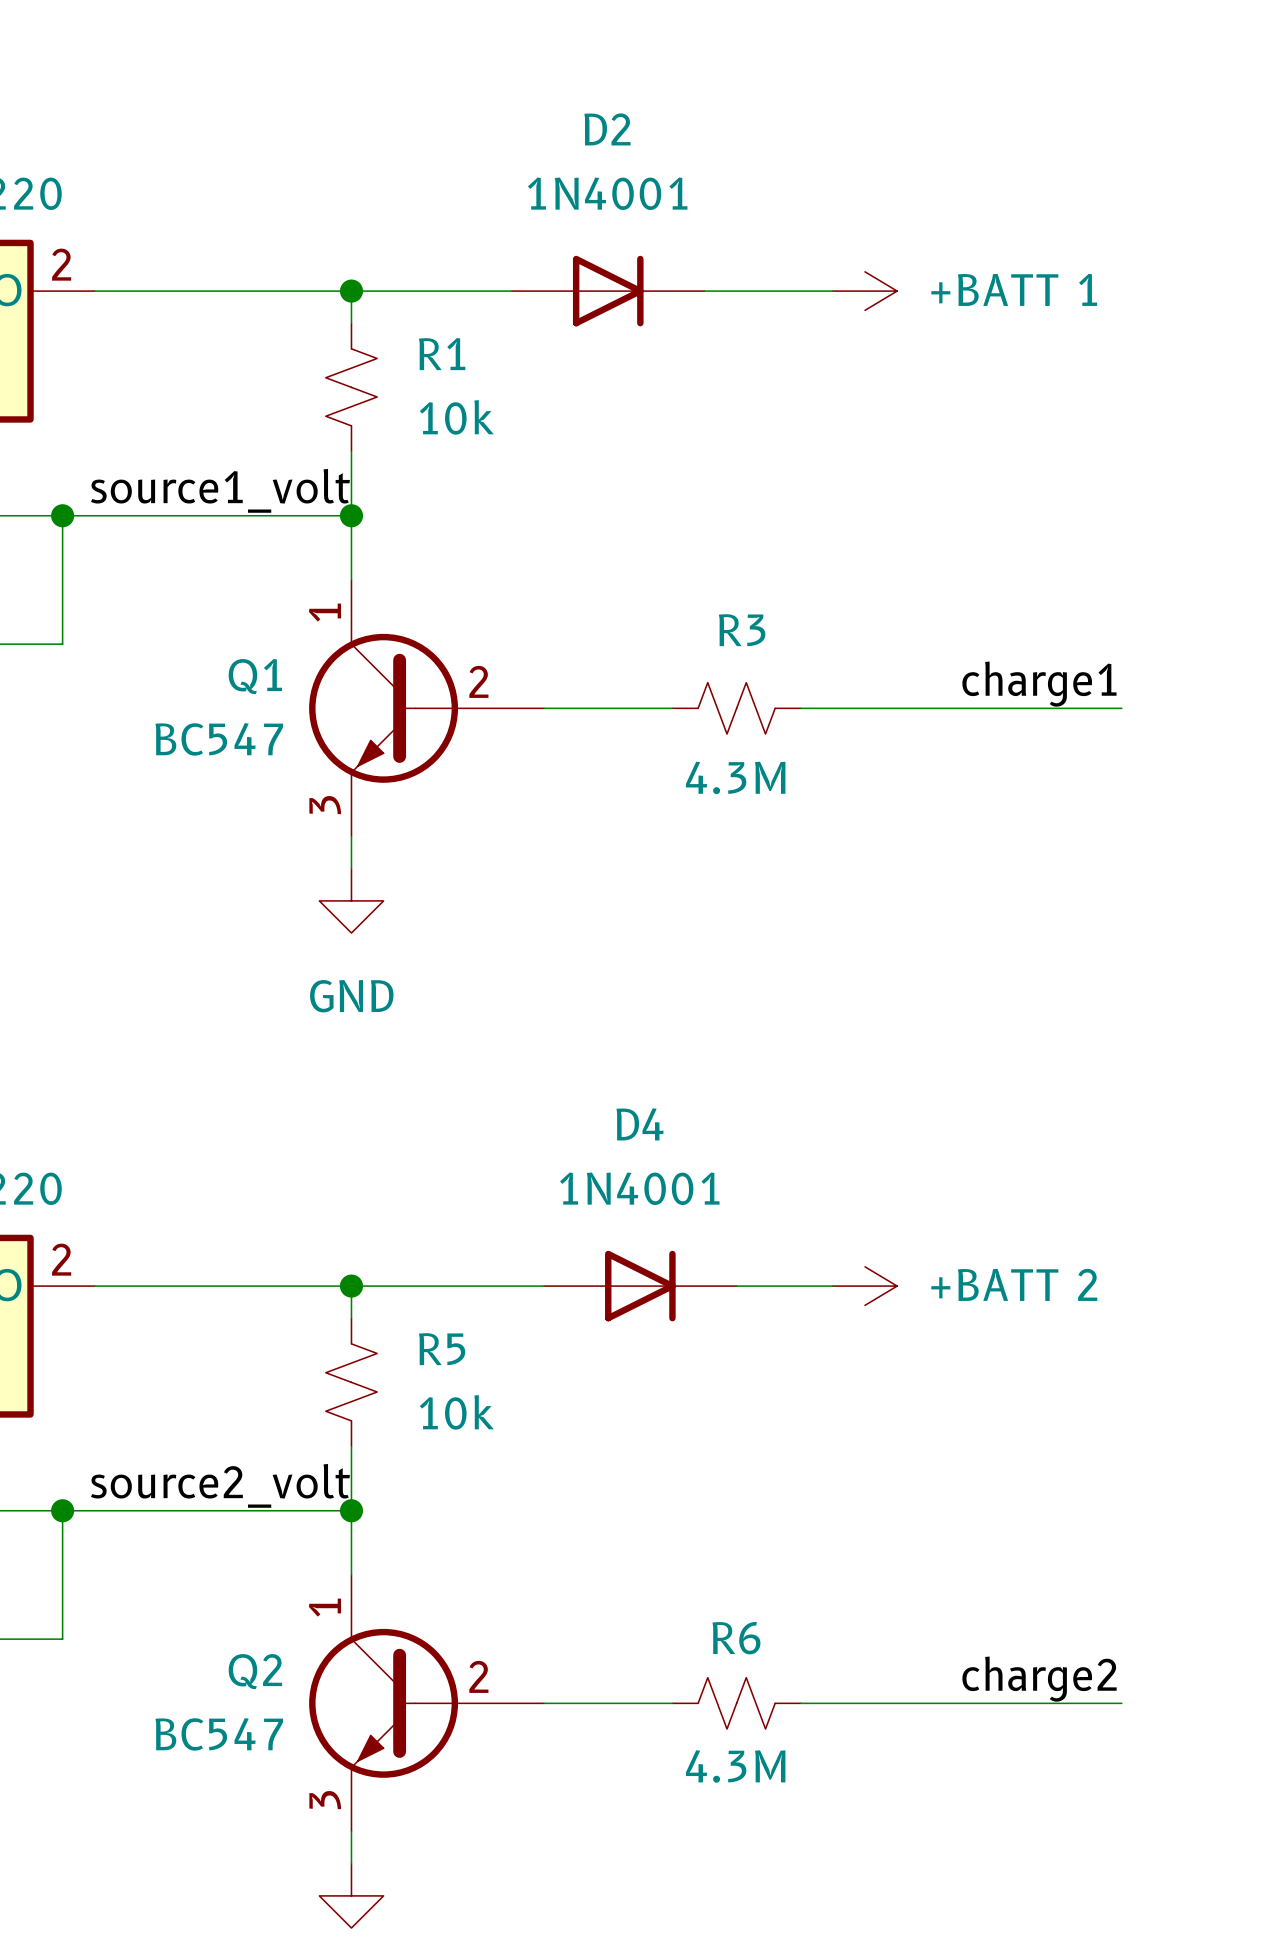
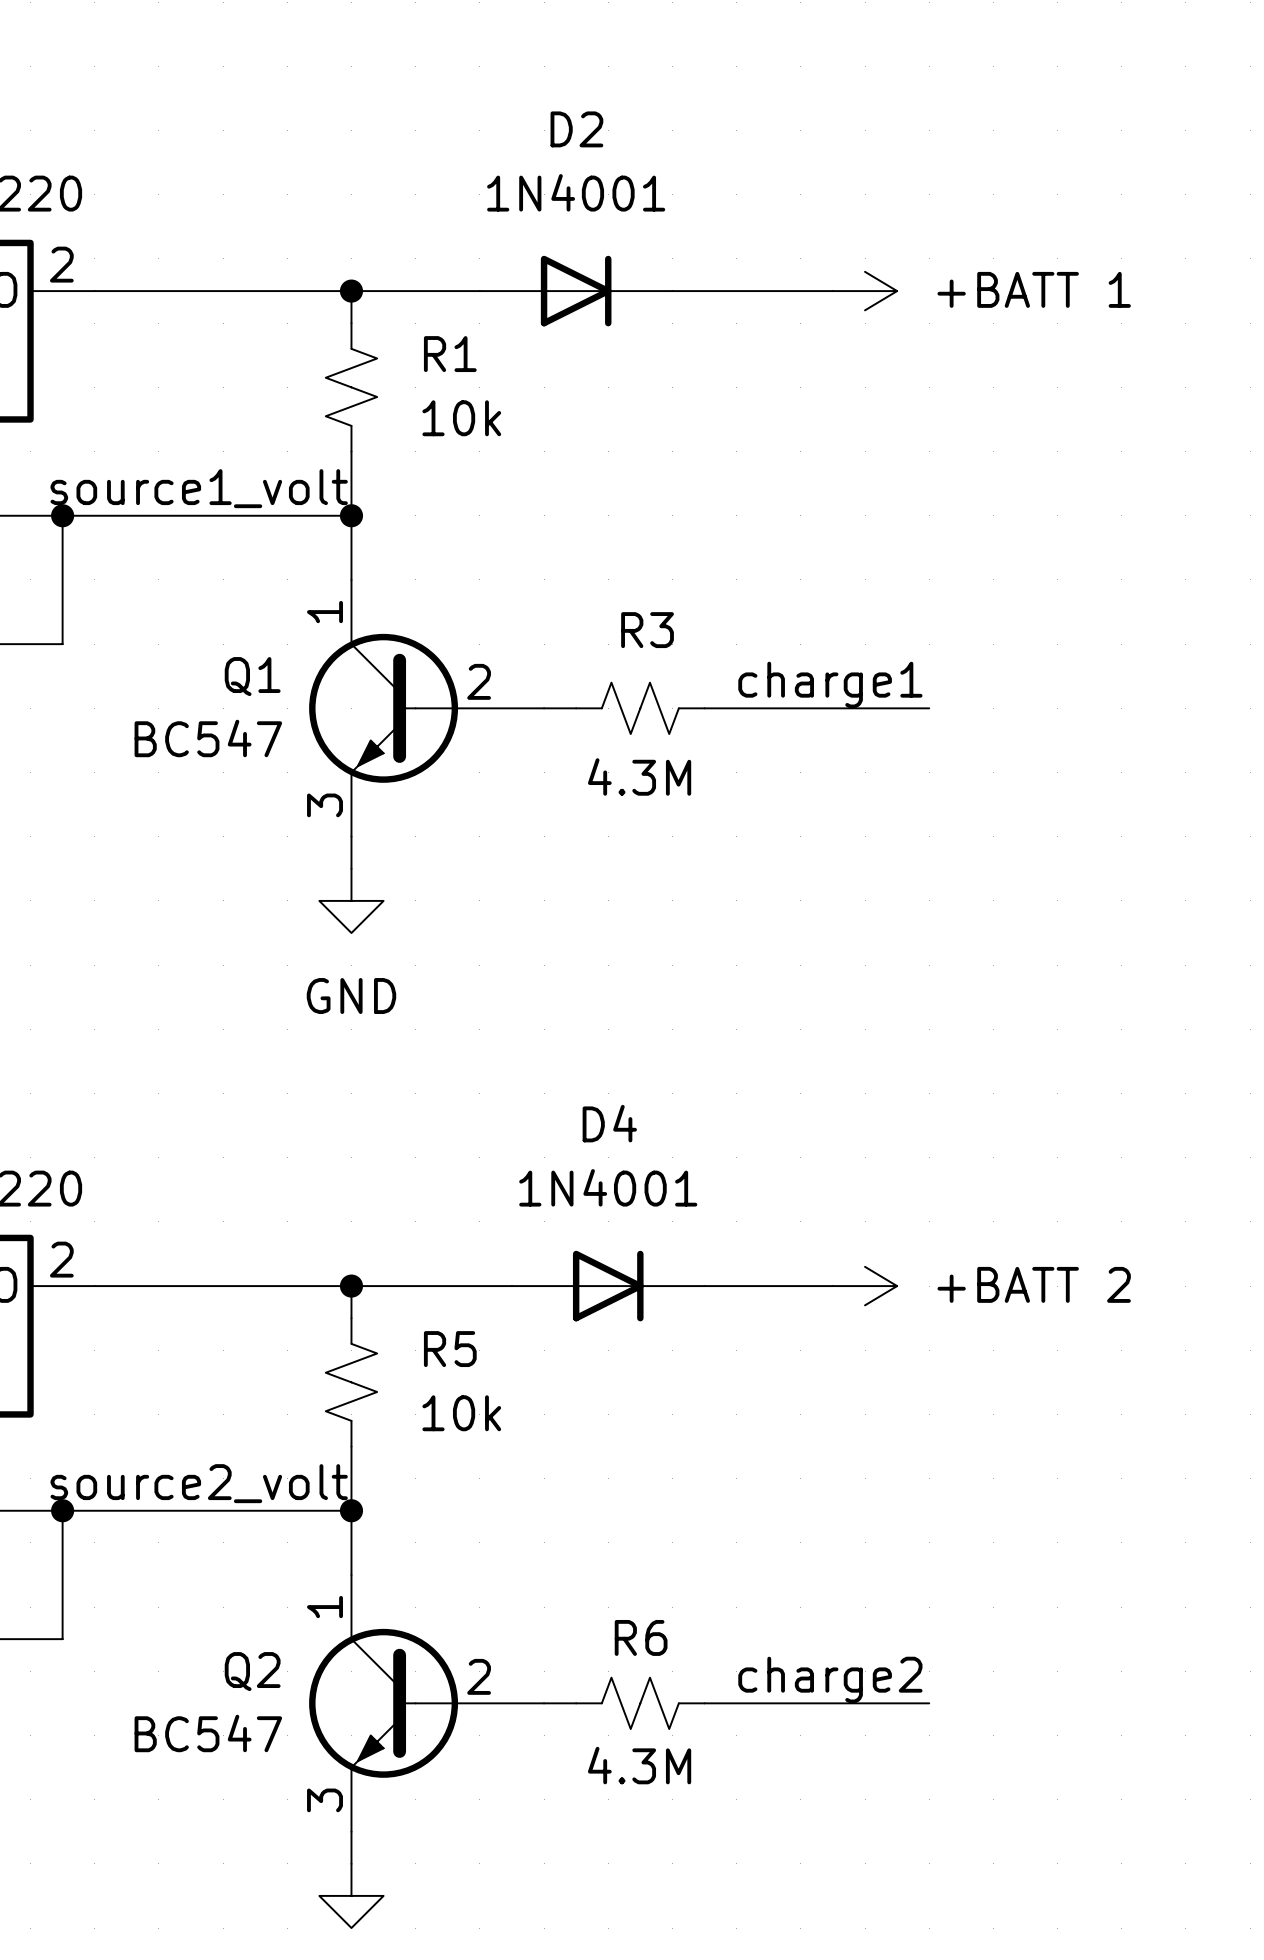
D2 position: (608, 291) -> (576, 291)
label position: charge1 (1039, 684) -> charge1 (830, 685)
wire: (576, 708) (672, 708) -> (704, 708) (800, 708)
R3 position: (736, 708) -> (640, 708)
wire: (929, 708) (1121, 708) -> none
D4 position: (640, 1286) -> (608, 1286)
label position: charge2 (1039, 1679) -> charge2 (830, 1680)
wire: (576, 1703) (672, 1703) -> (704, 1703) (800, 1703)
R6 position: (736, 1703) -> (640, 1703)
wire: (929, 1703) (1121, 1703) -> none

